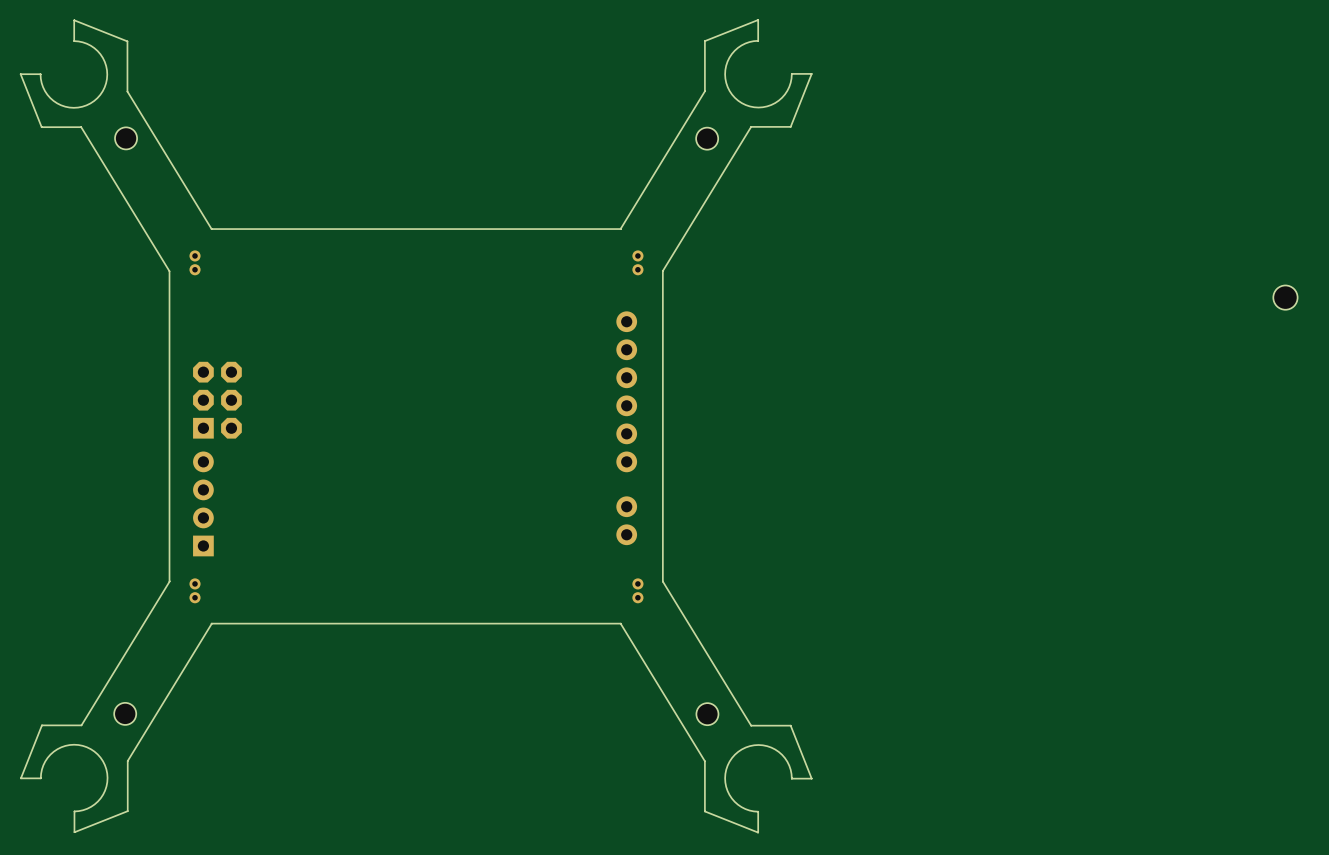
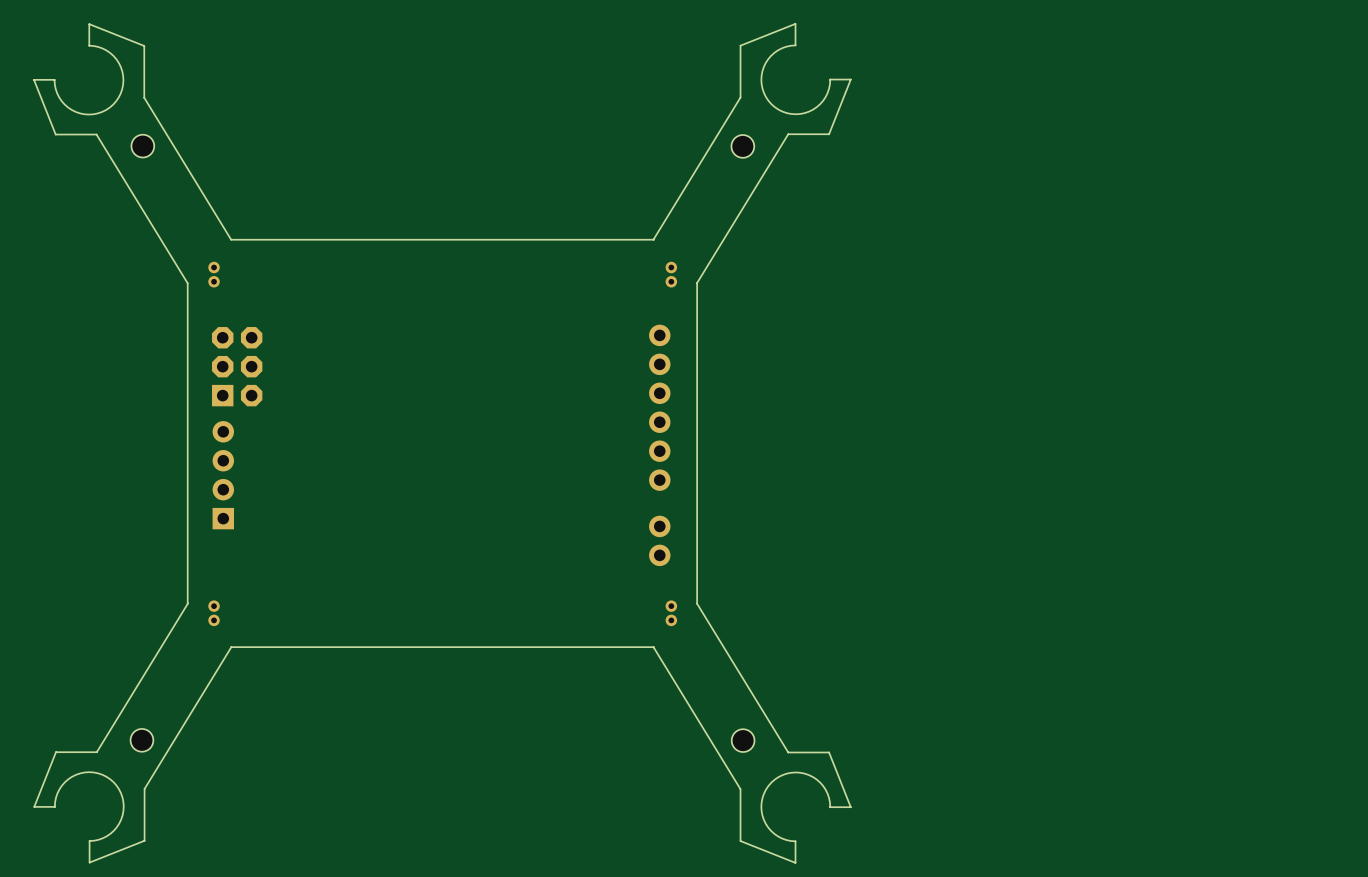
hole: (1285, 297) -> none
part position: (217, 400) -> (237, 366)
part position: (203, 503) -> (223, 475)

